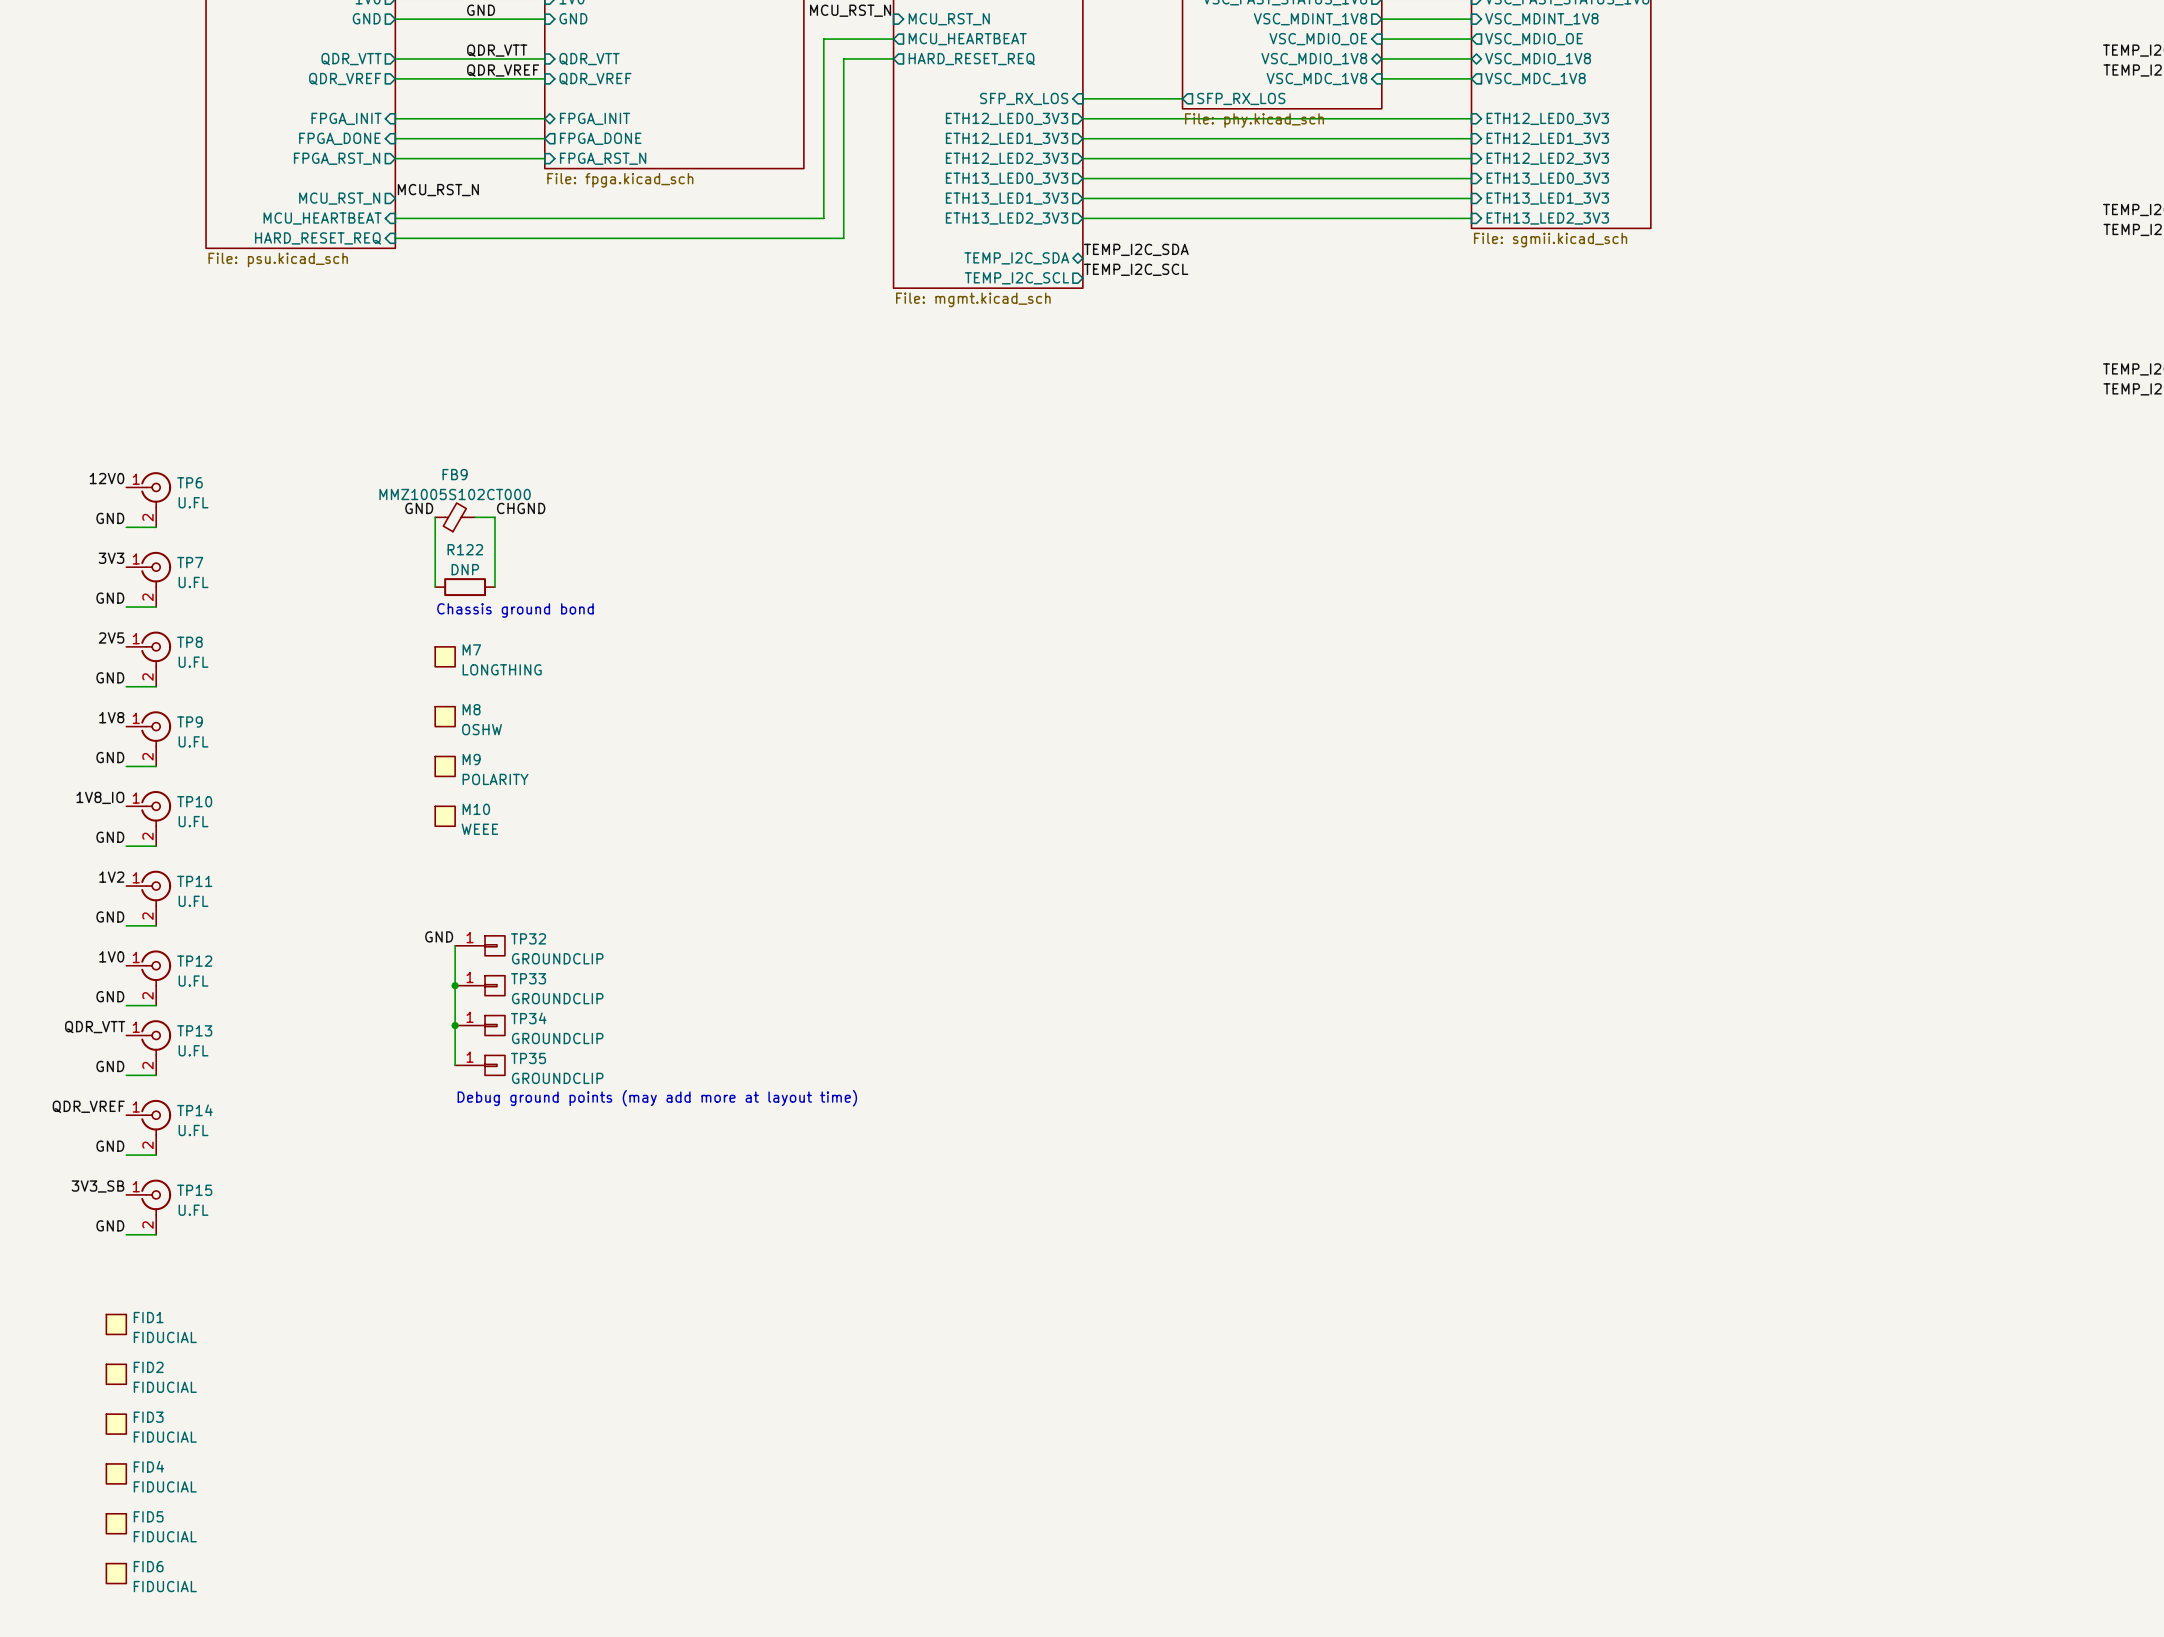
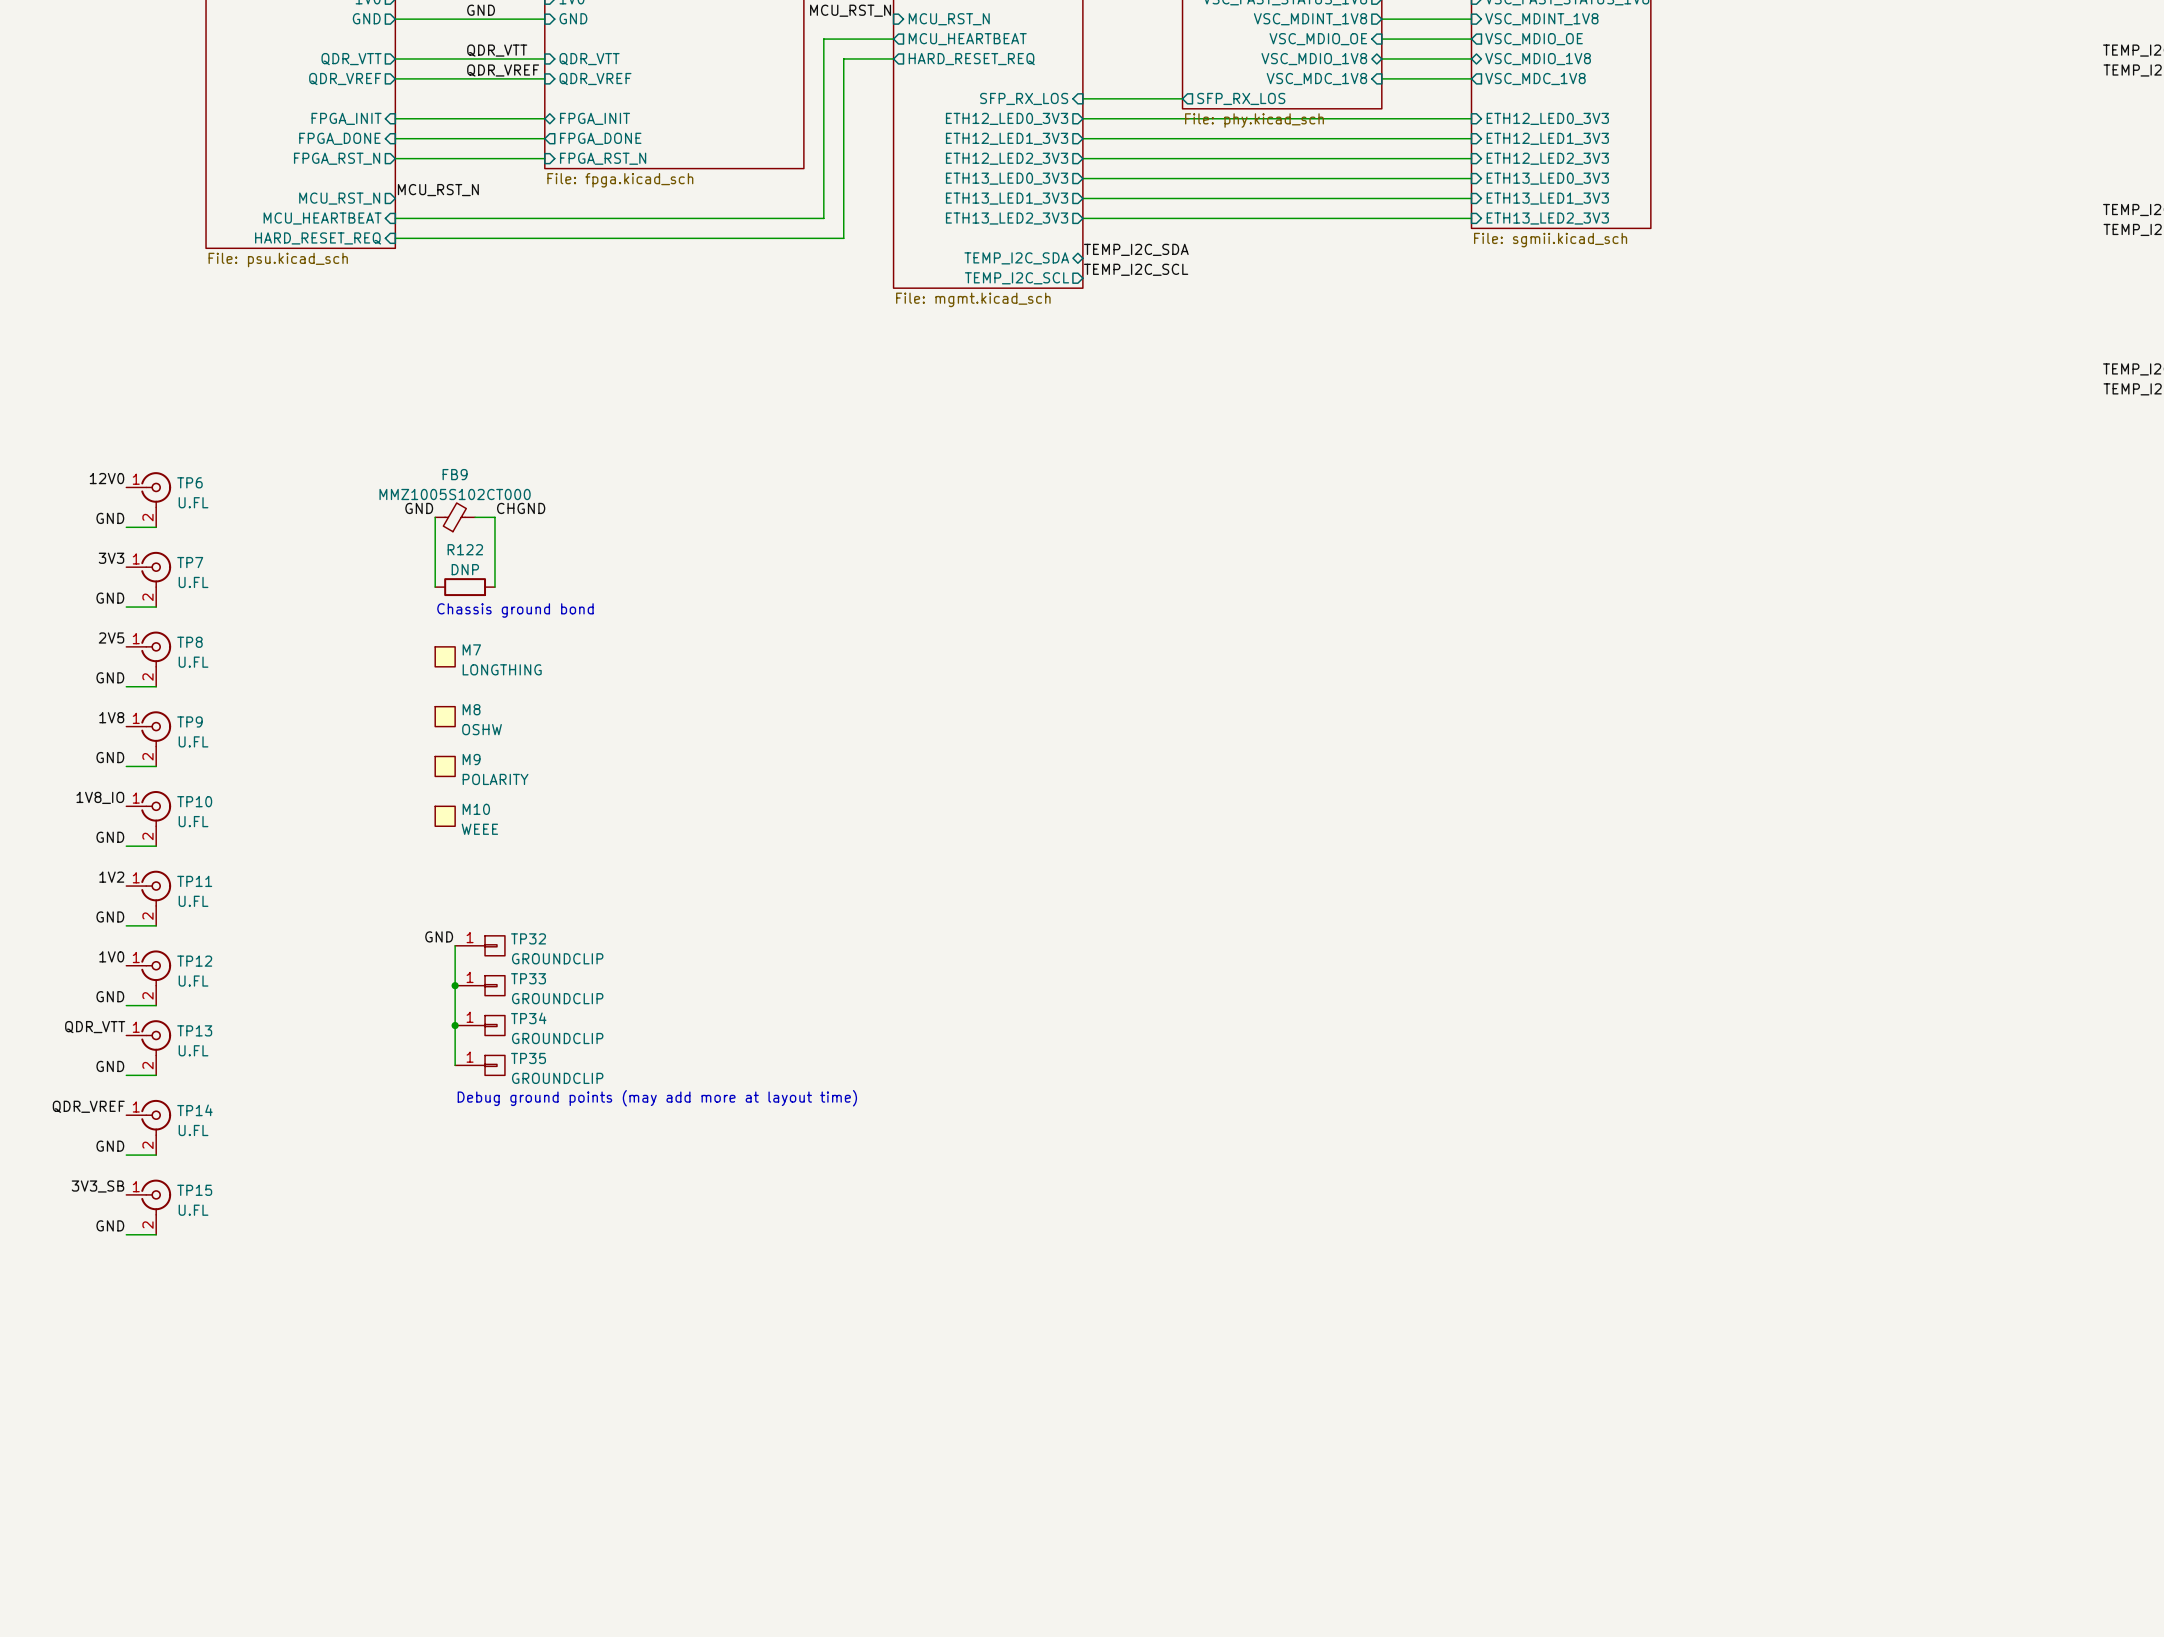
FID1: FIDUCIAL (116, 1324) -> none
FID2: FIDUCIAL (116, 1374) -> none
FID3: FIDUCIAL (116, 1424) -> none
FID4: FIDUCIAL (116, 1473) -> none
FID5: FIDUCIAL (116, 1523) -> none
FID6: FIDUCIAL (116, 1573) -> none

